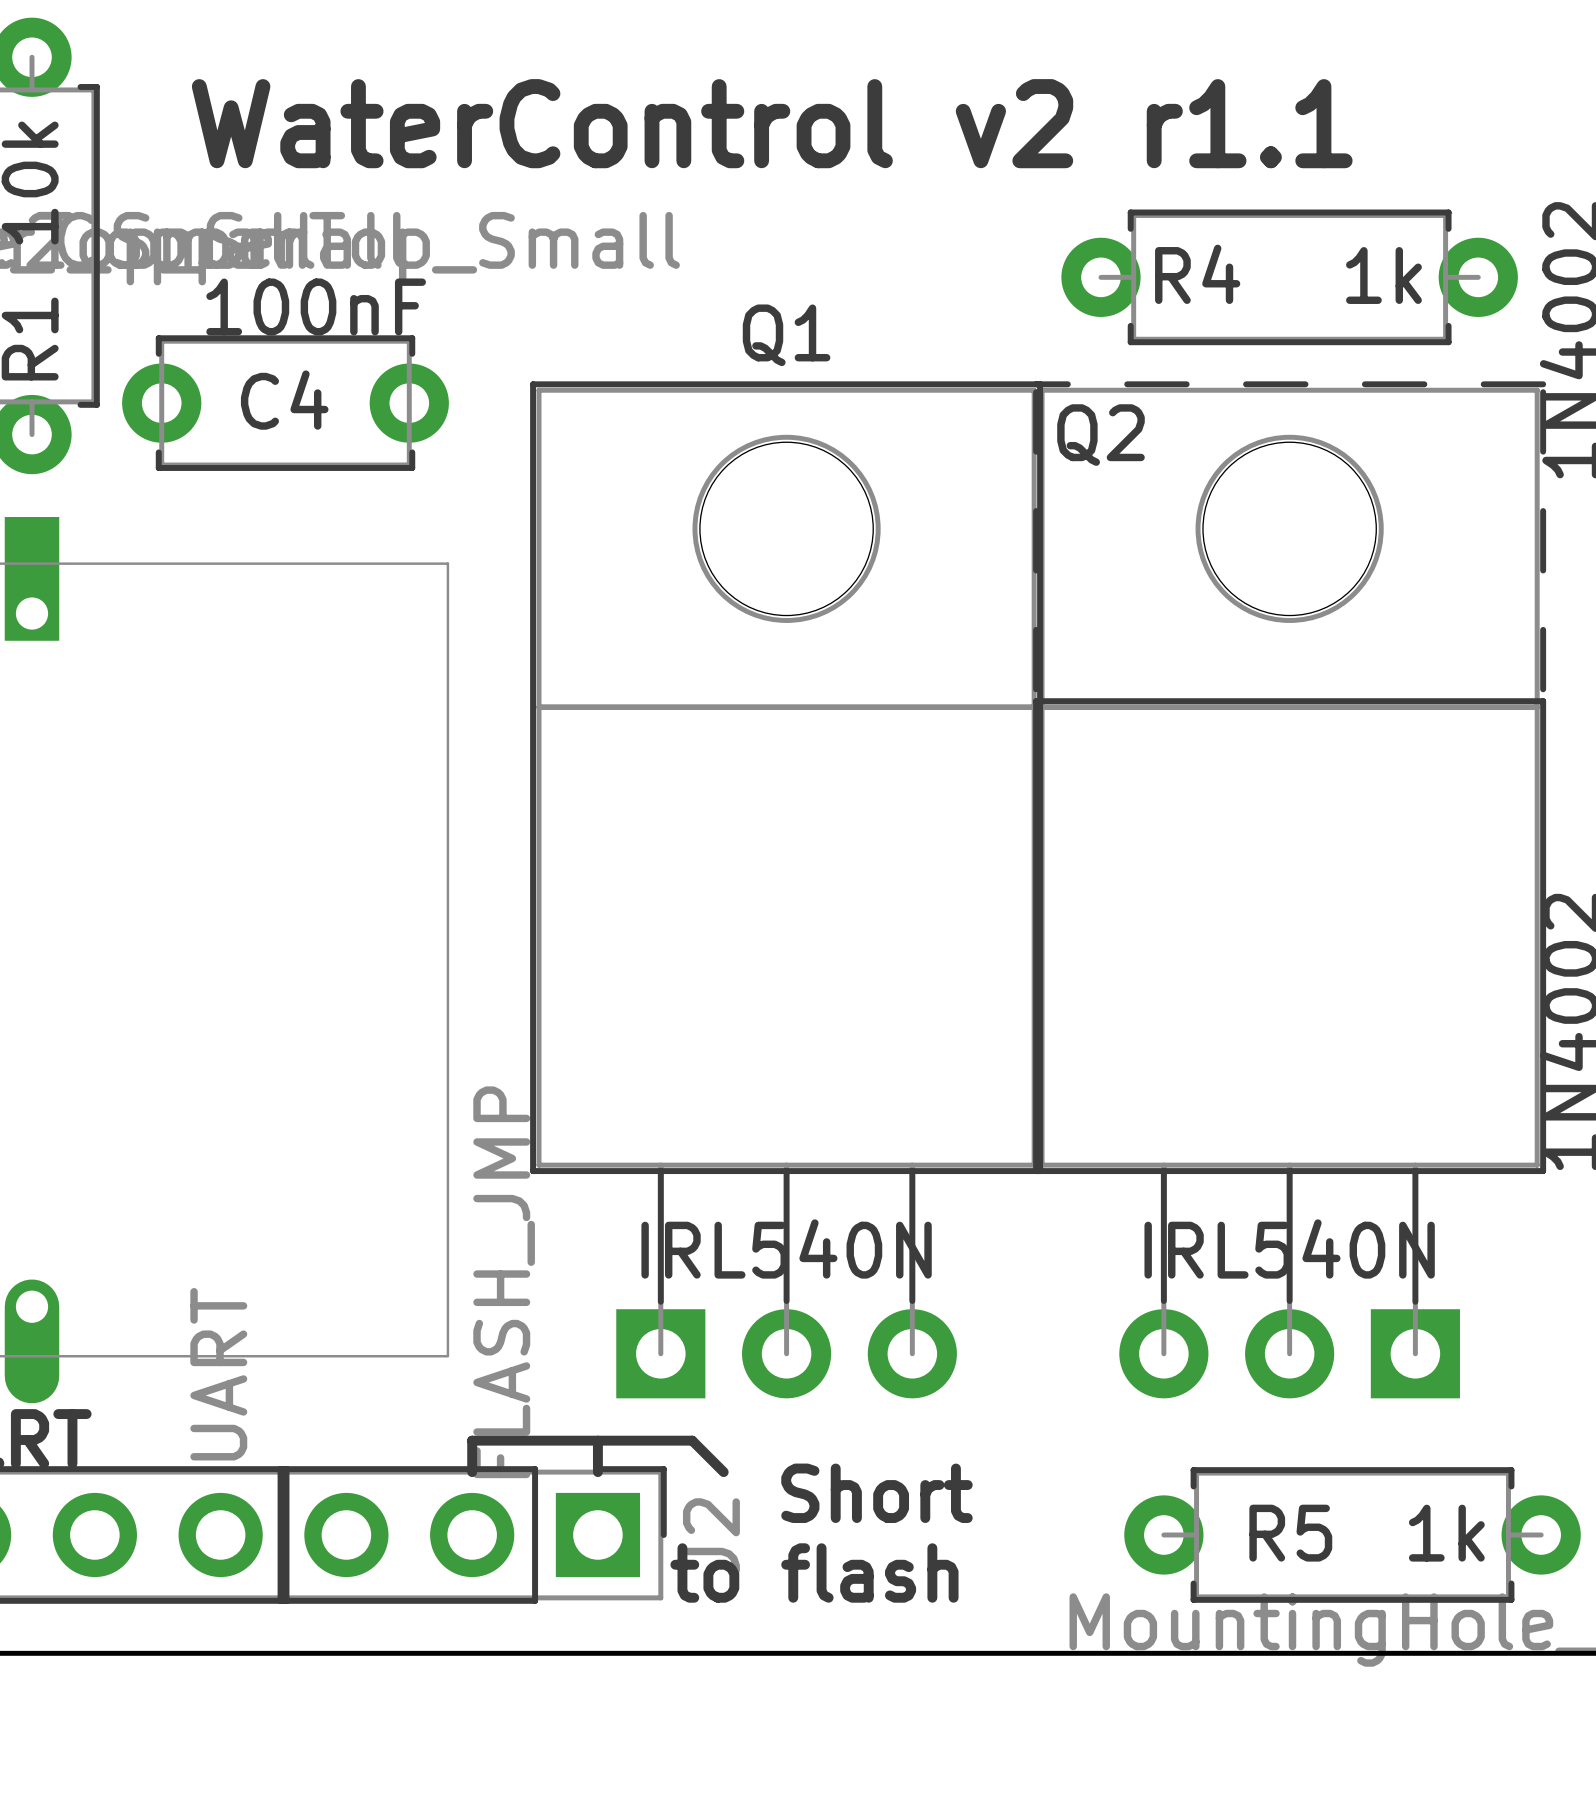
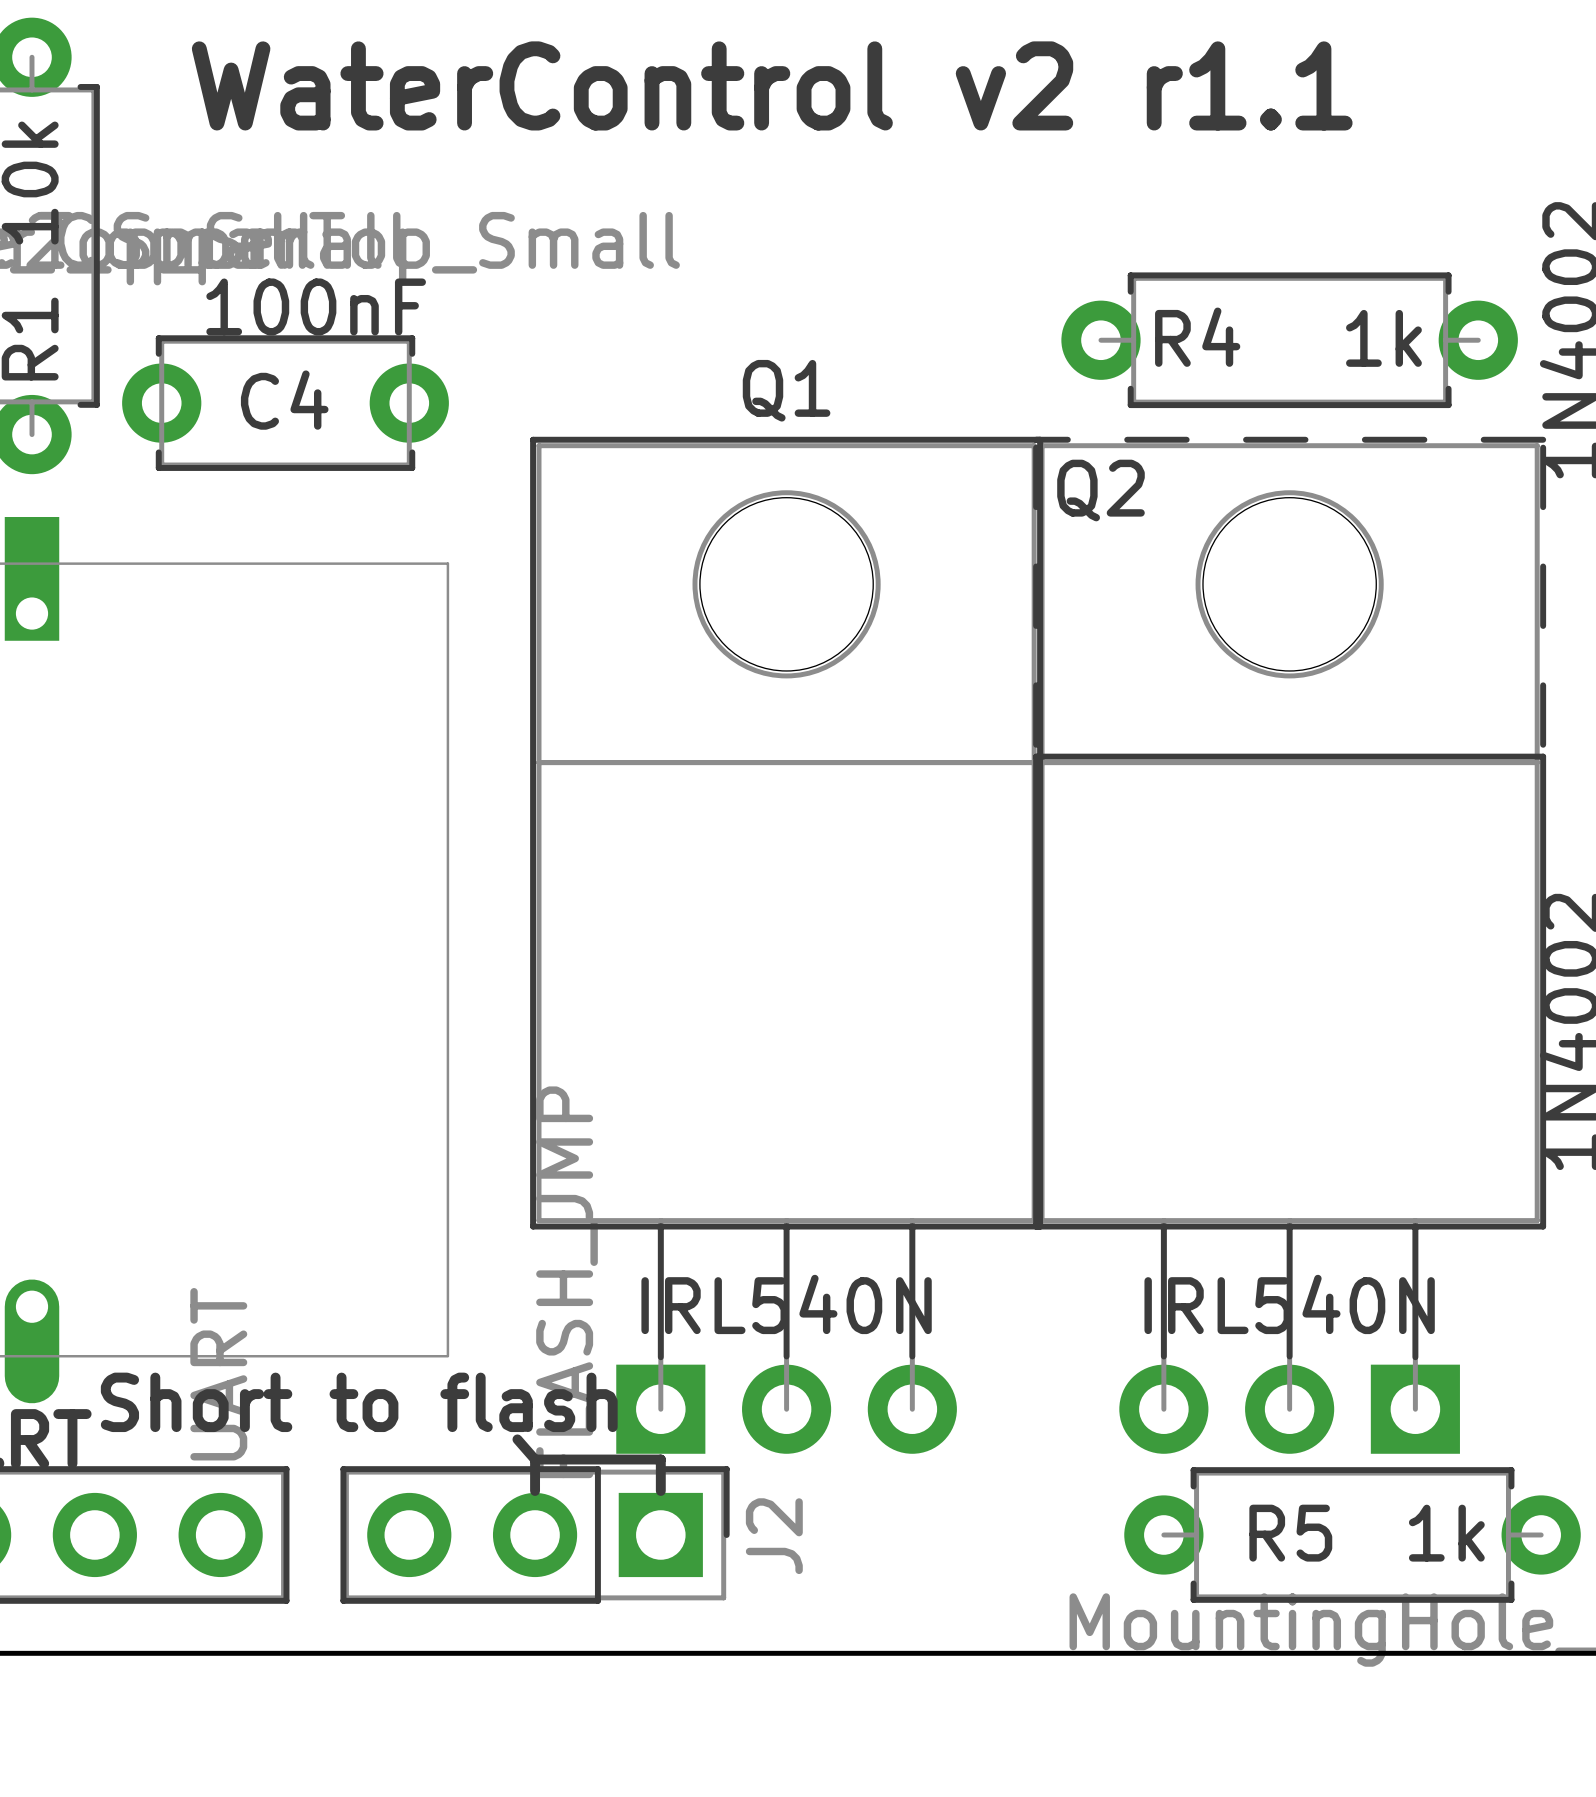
text position: WaterControl v2 r1.1 (772, 123) -> WaterControl v2 r1.1 (772, 85)
R4 position: (1289, 277) -> (1289, 340)
Q1 position: (786, 889) -> (786, 945)
Q2 position: (1289, 889) -> (1289, 945)
text: none -> Short to flash (359, 1402)
line: none -> (517, 1439) (535, 1459)
line: (597, 1440) (597, 1472) -> (535, 1459) (535, 1490)
line: none -> (535, 1459) (660, 1459) (660, 1490)
line: (472, 1472) (472, 1440) (692, 1440) (723, 1472) -> none
text: Short (876, 1493) -> none
J2 position: (472, 1534) -> (535, 1534)
text: to flash (814, 1572) -> none

